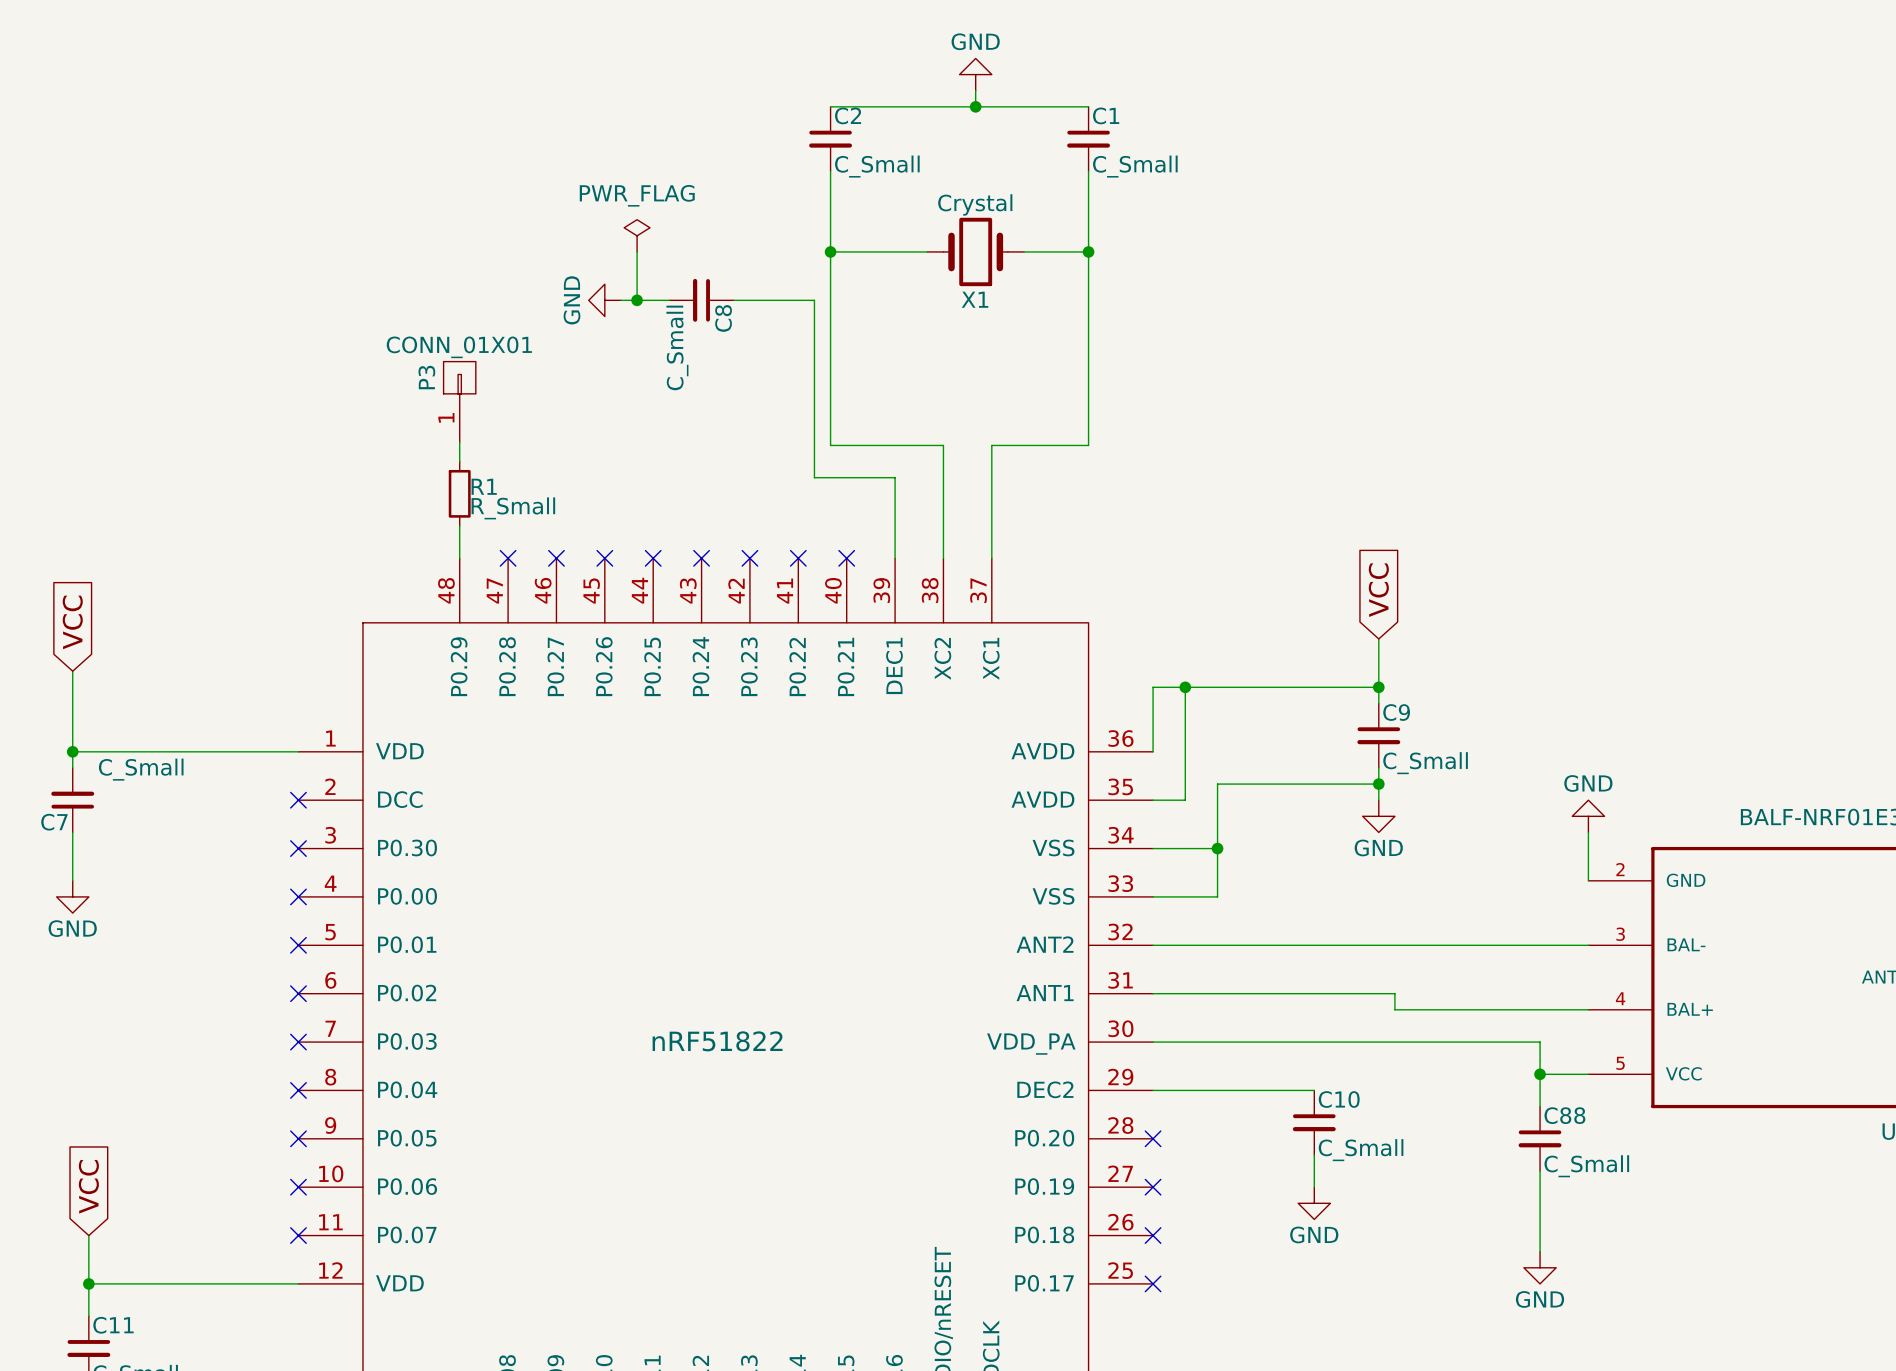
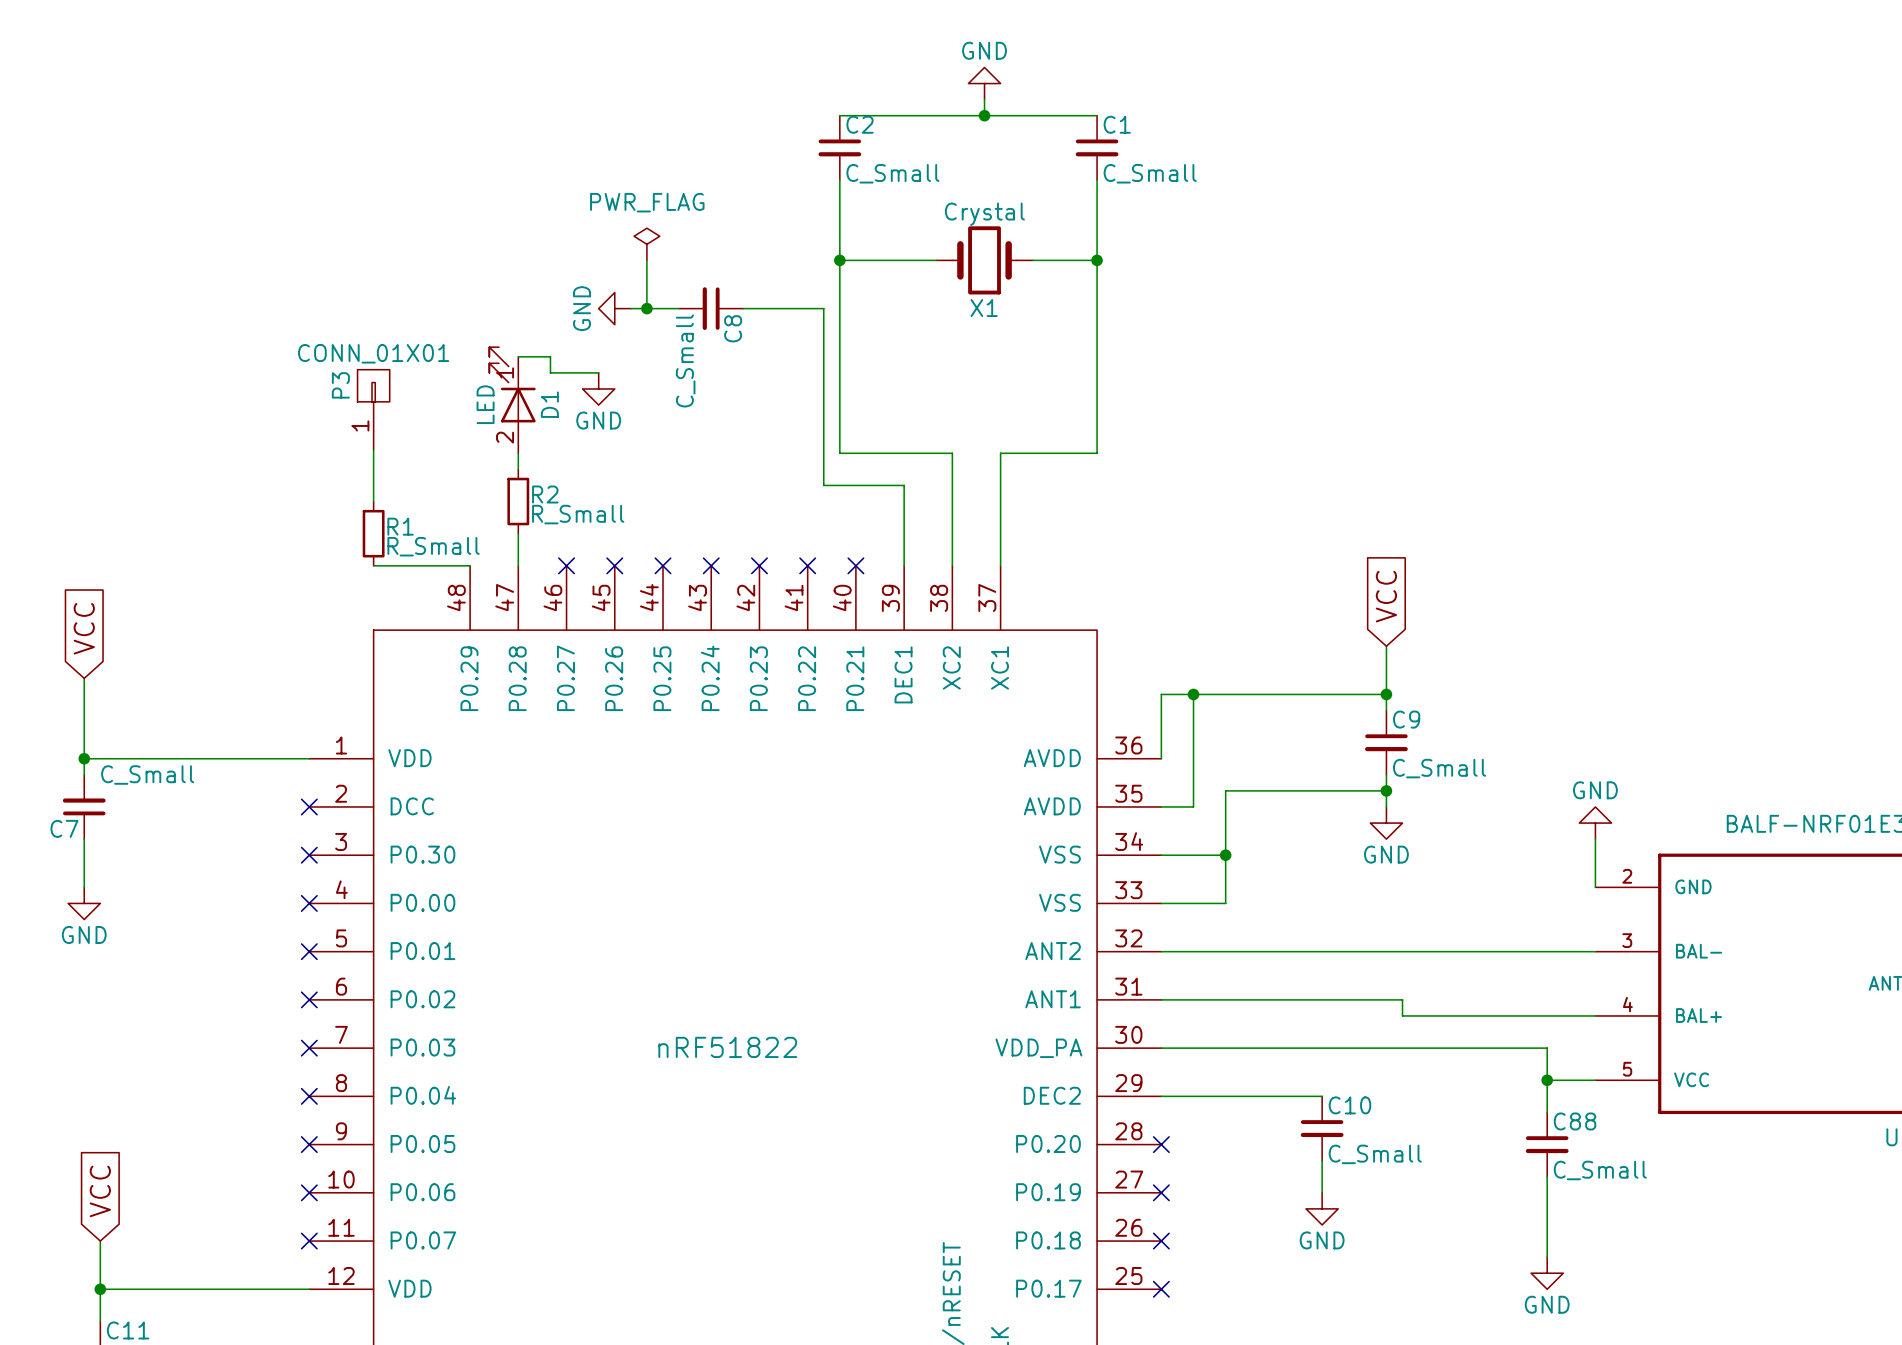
wire: none -> (518, 356) (550, 356) (550, 372) (598, 372)
power symbol: none -> GND (598, 389)
D1: none -> LED (512, 400)
P3 position: (459, 401) -> (373, 409)
wire: none -> (373, 450) (373, 501)
wire: (459, 442) (459, 461) -> none
wire: none -> (518, 453) (518, 469)
R1 position: (459, 493) -> (373, 533)
R2: none -> R_Small (518, 501)
wire: (459, 526) (459, 558) -> (373, 565) (470, 565)
wire: none -> (518, 533) (518, 565)
no-connect mark: (508, 558) -> none

